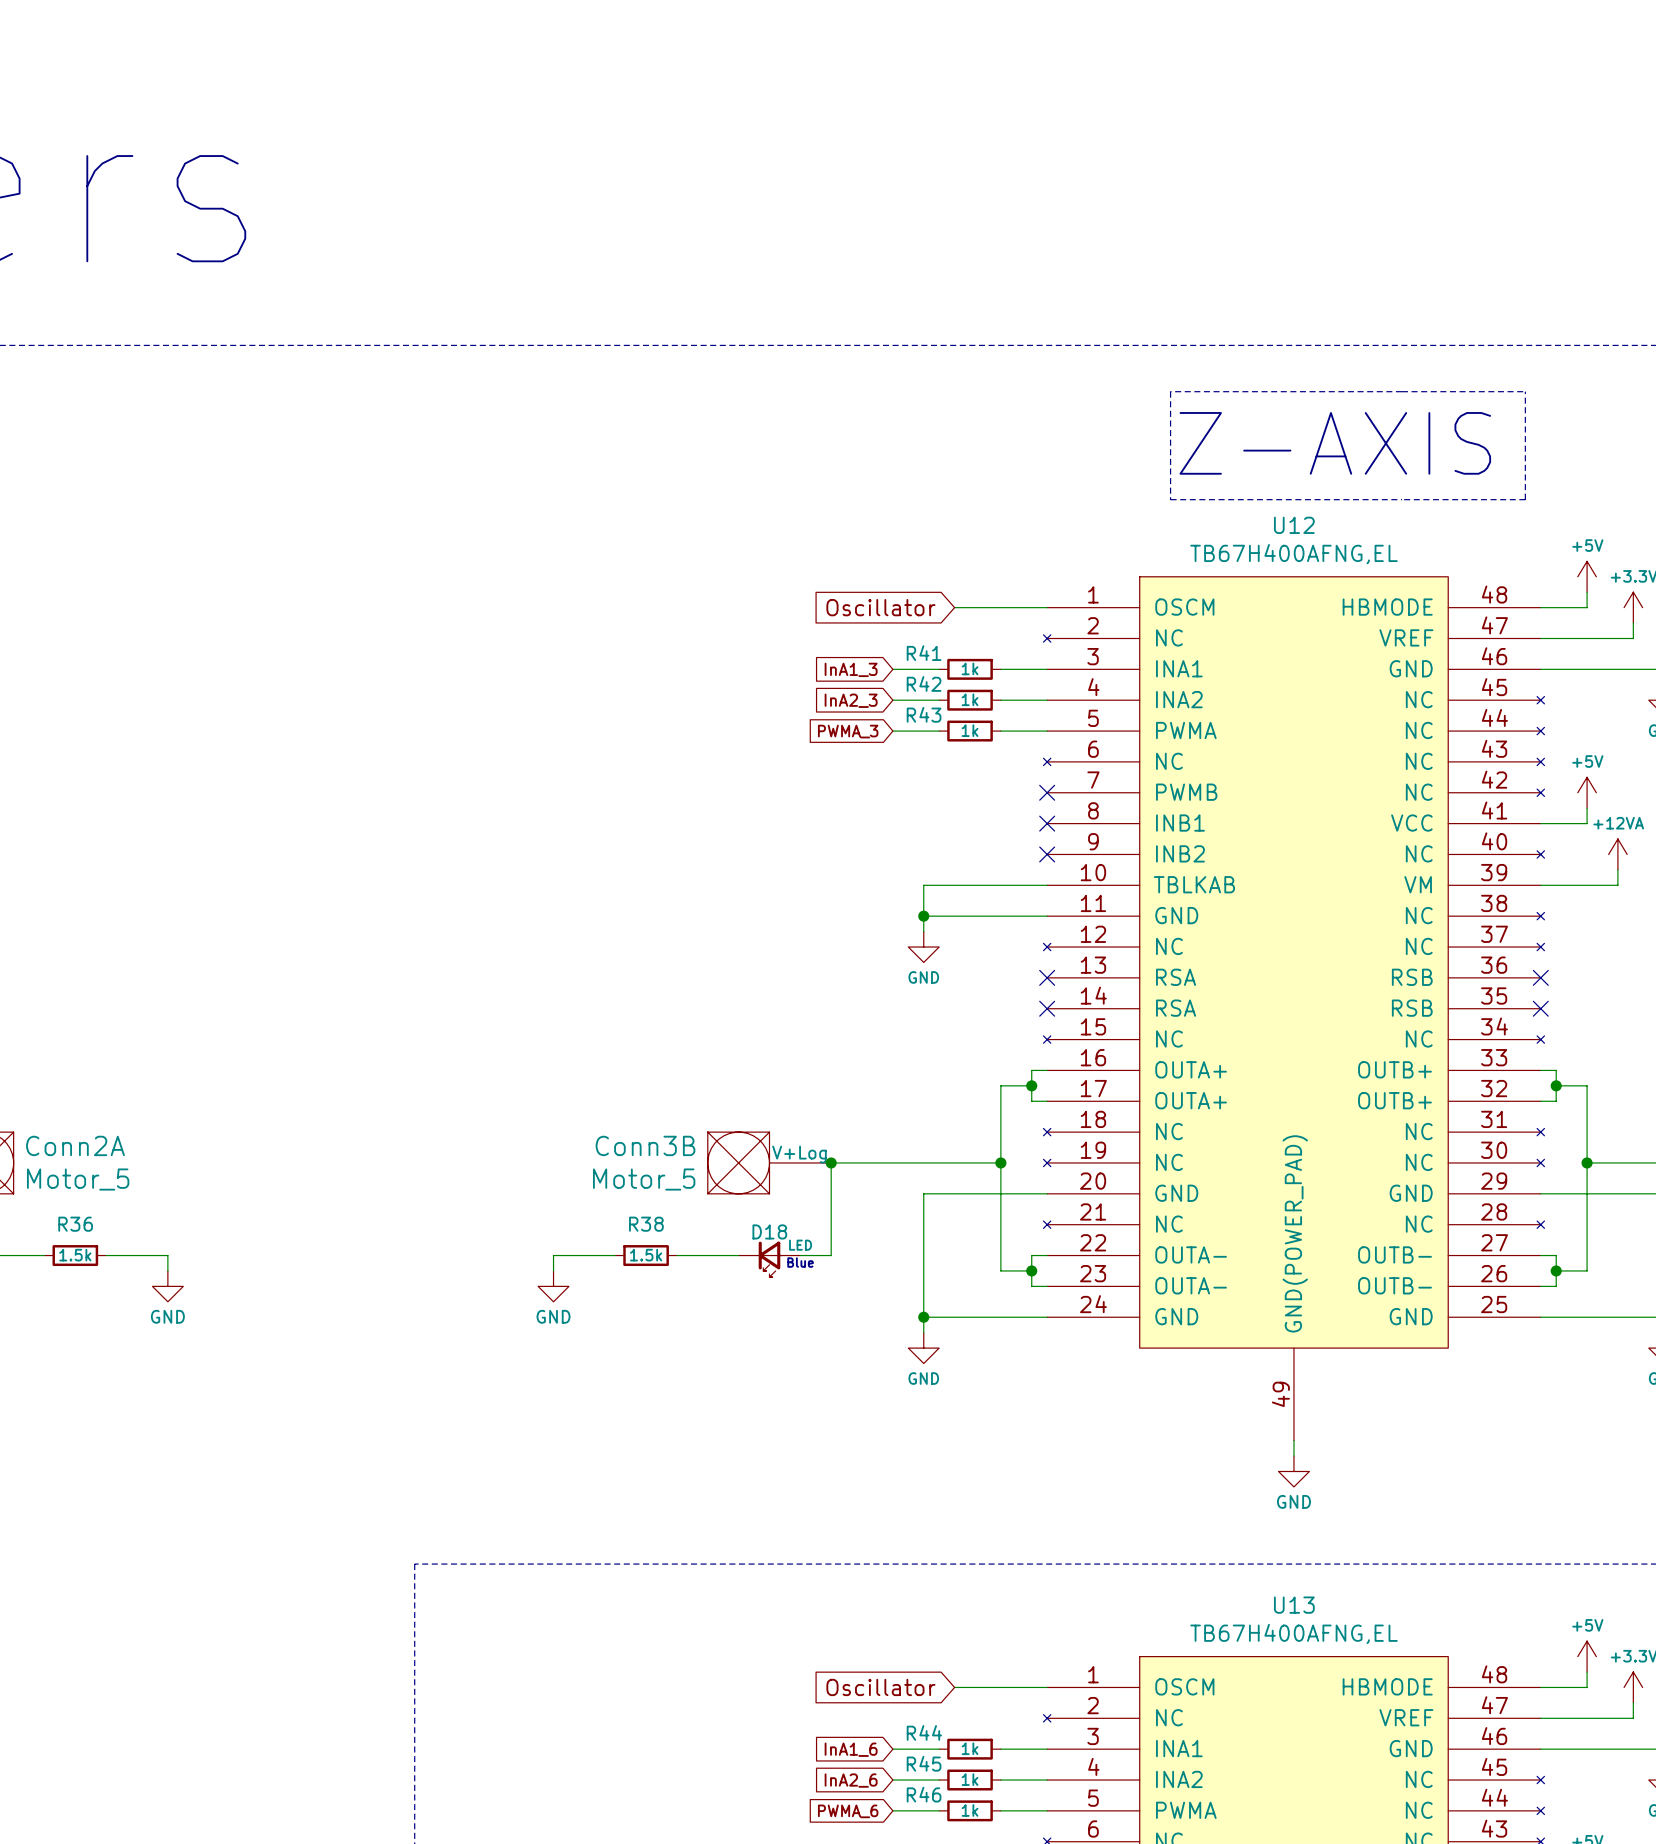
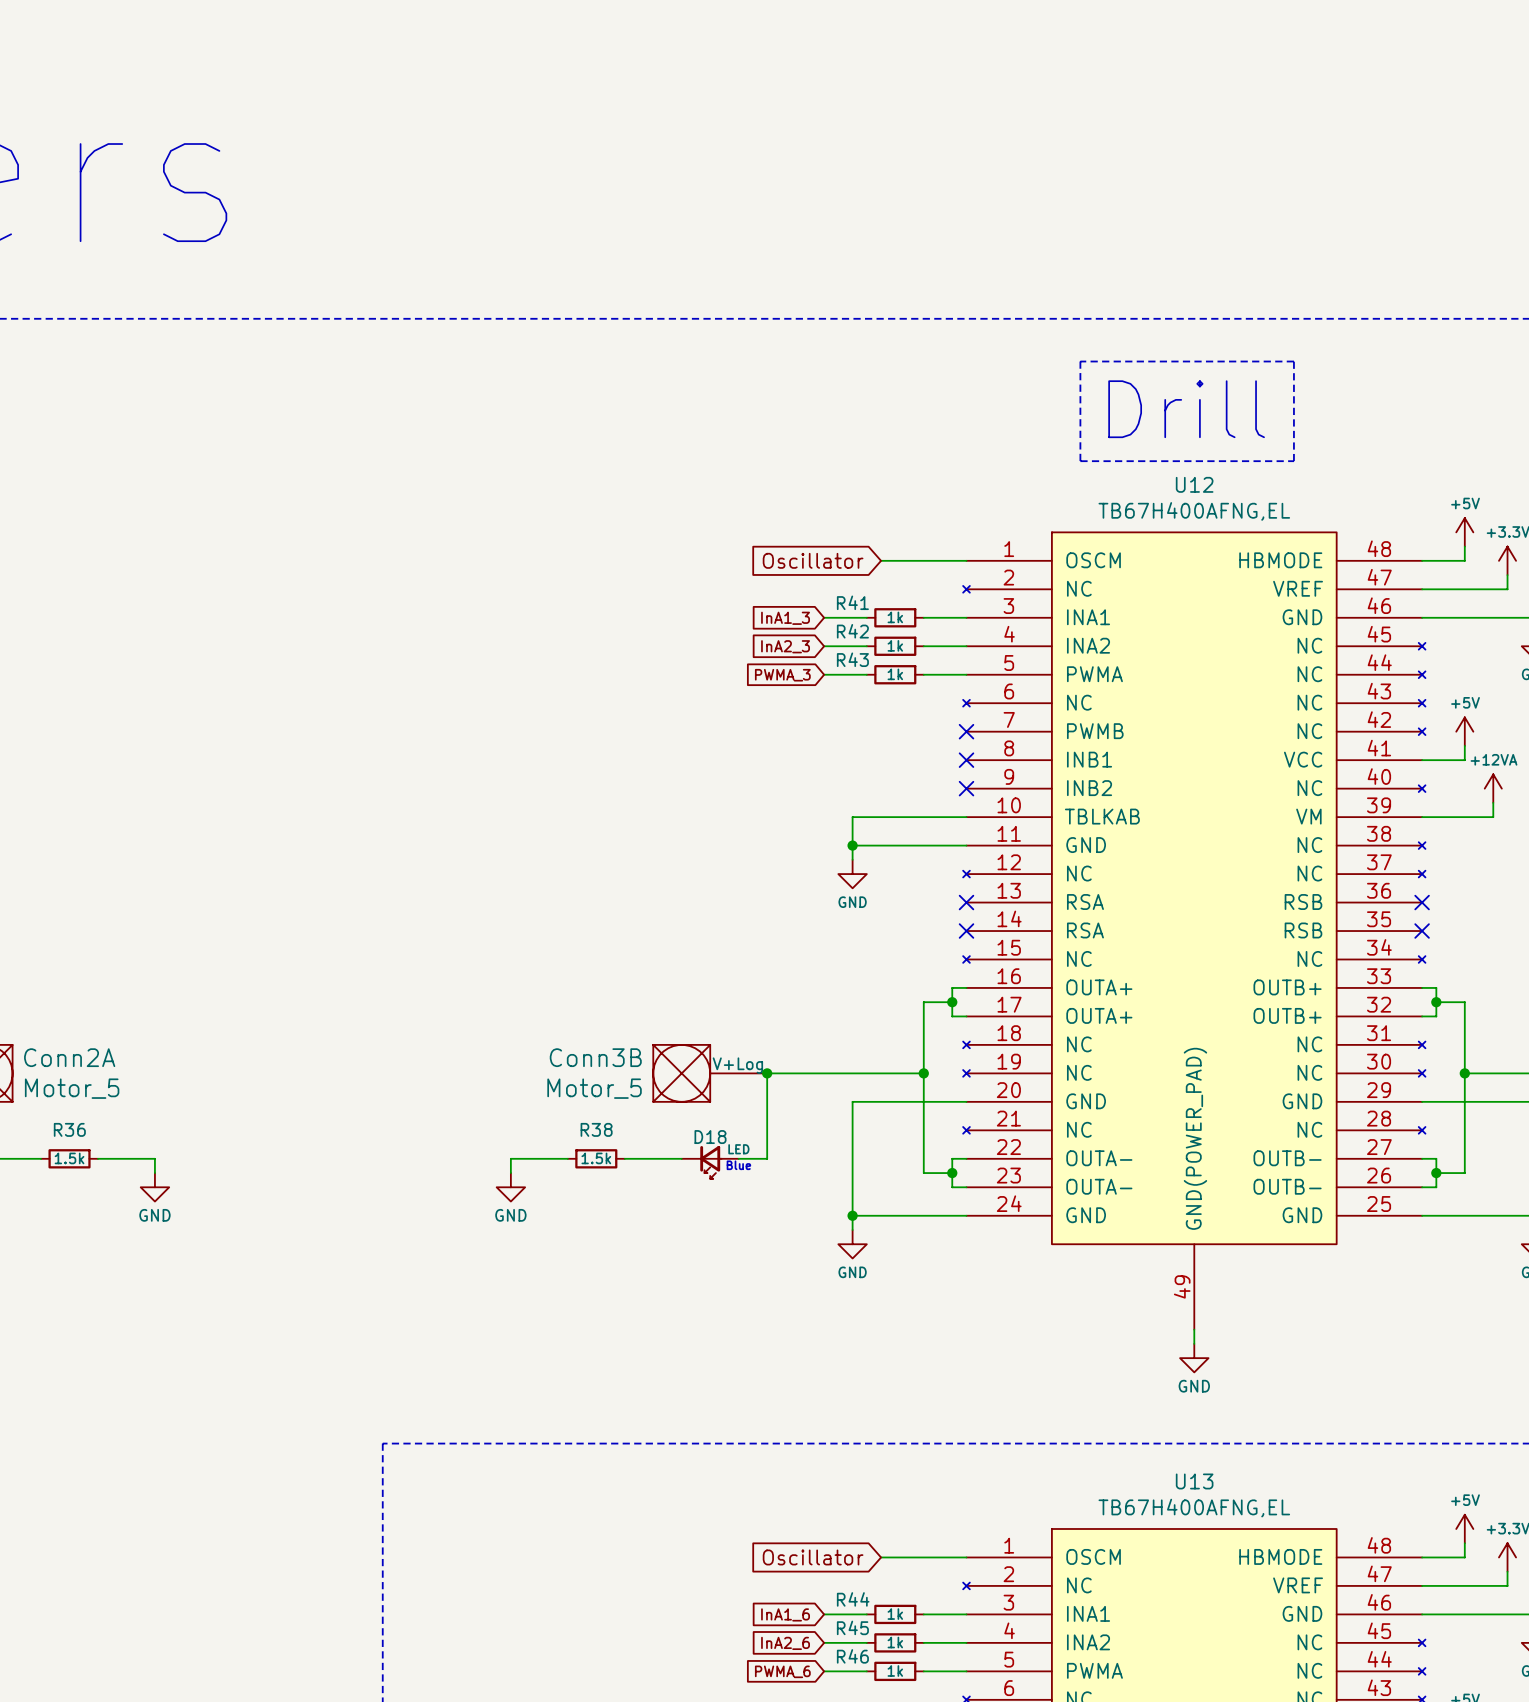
line: (1401, 391) (1525, 391) (1525, 499) (1401, 499) -> (1293, 361) (1293, 461)
text: none -> Drill (1186, 409)
text: Z-AXIS (1335, 443) -> none

